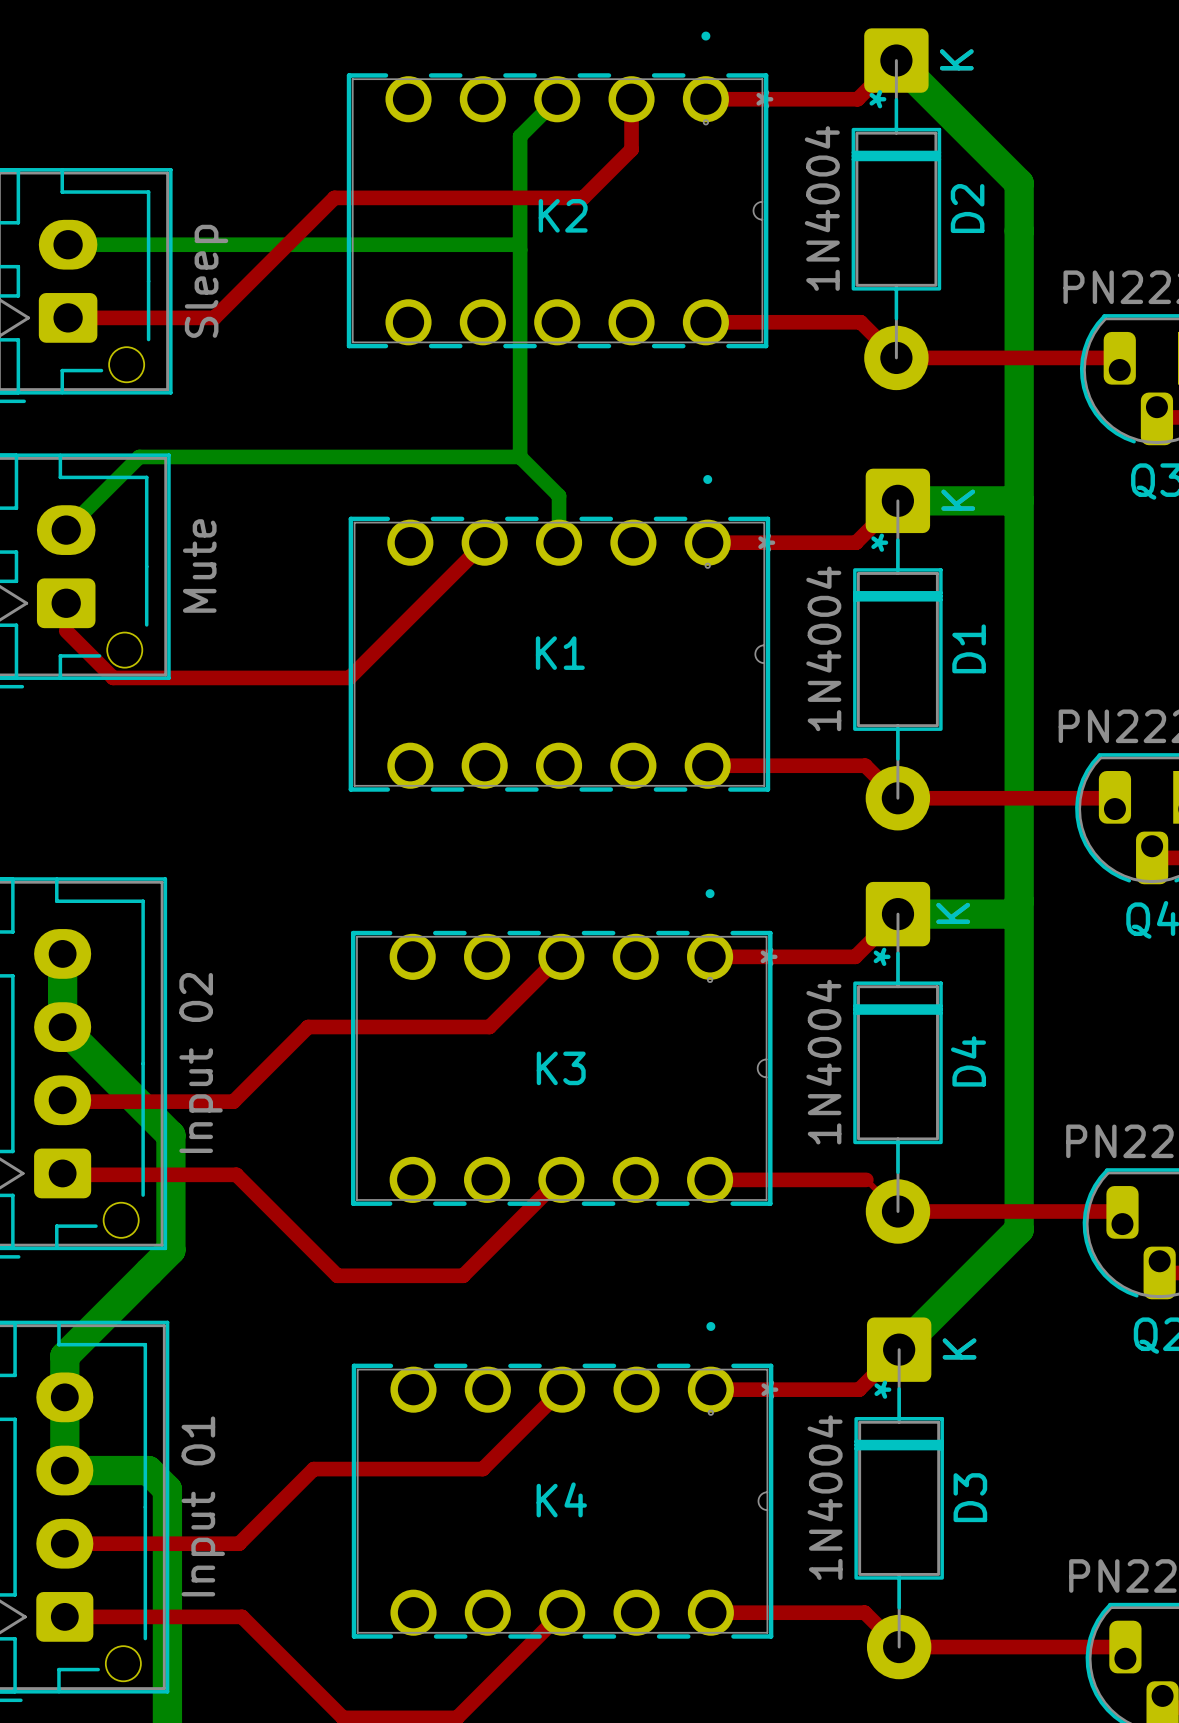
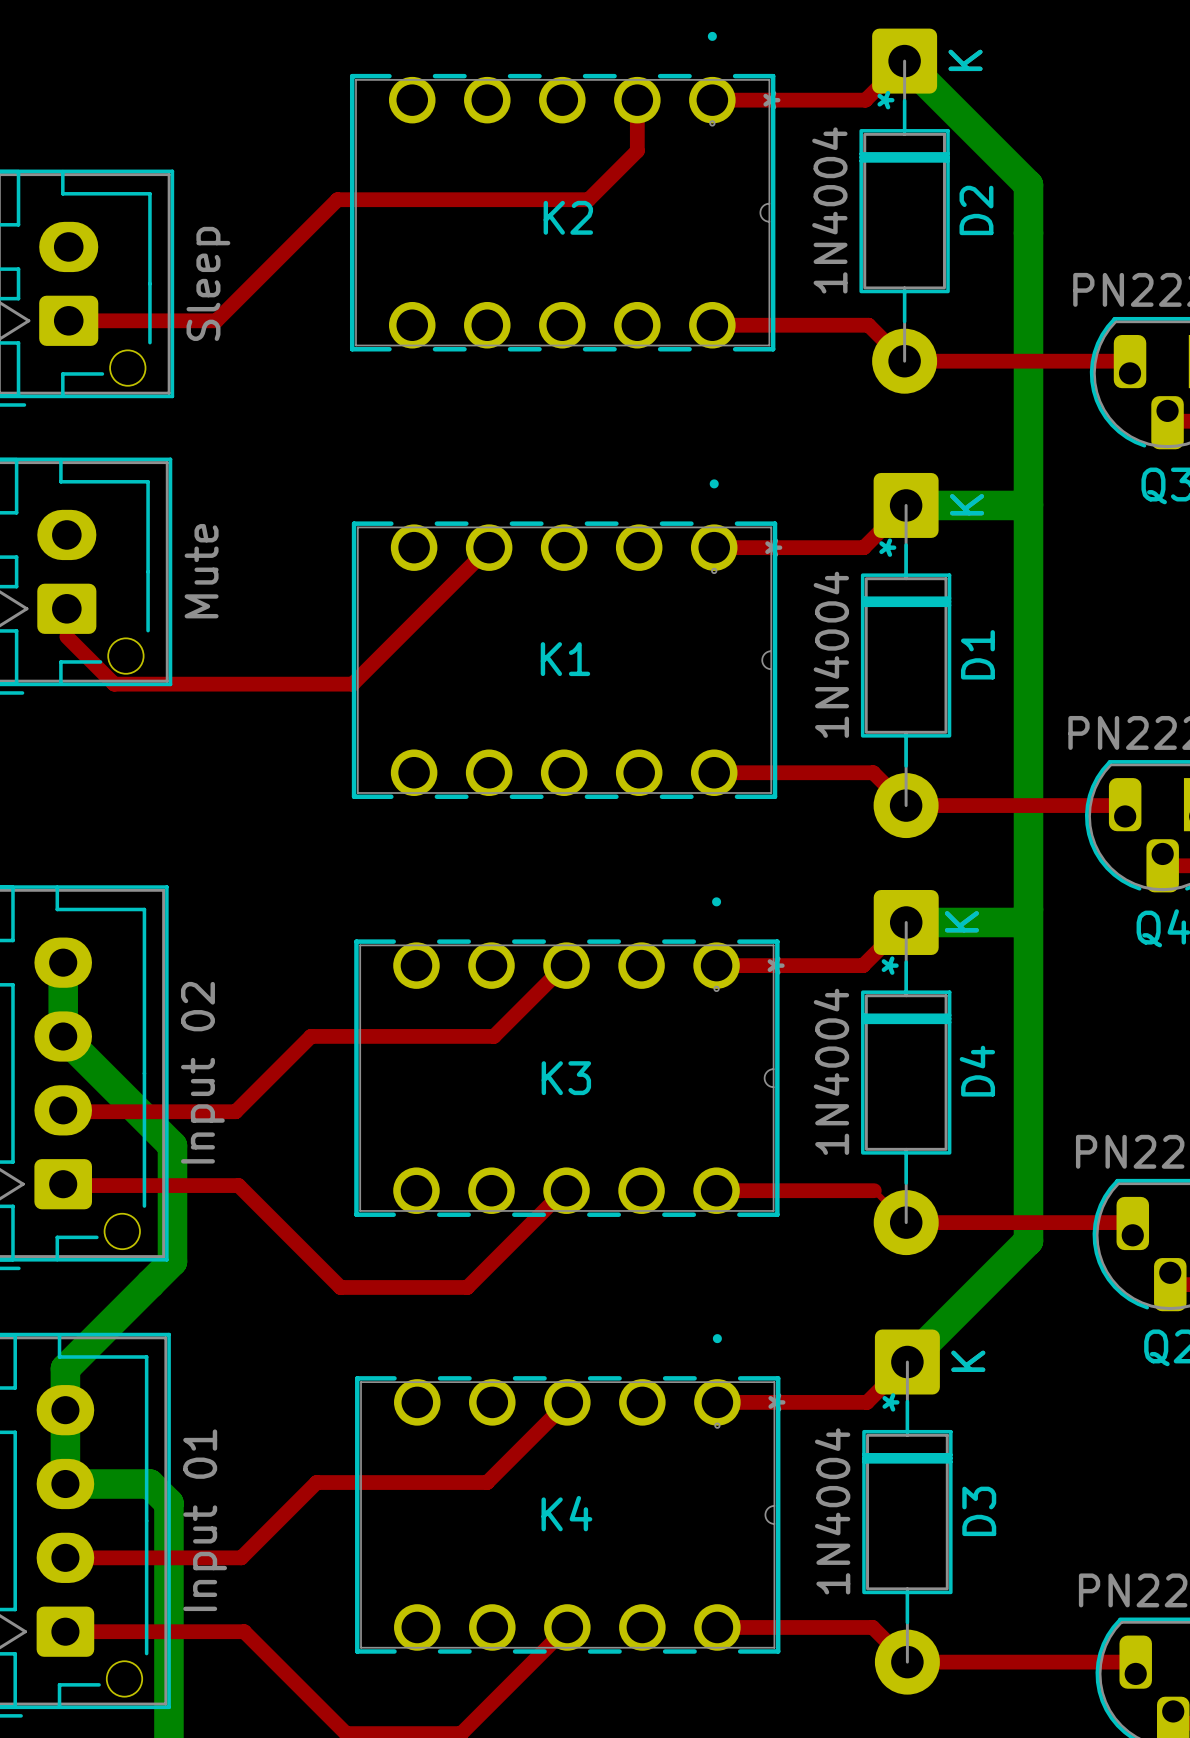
bottom track: (557, 99) (520, 136) (520, 456) -> none
bottom track: (68, 244) (514, 244) (520, 249) -> none
bottom track: (520, 456) (559, 495) (559, 542) -> none
bottom track: (520, 456) (139, 456) (66, 530) -> none

